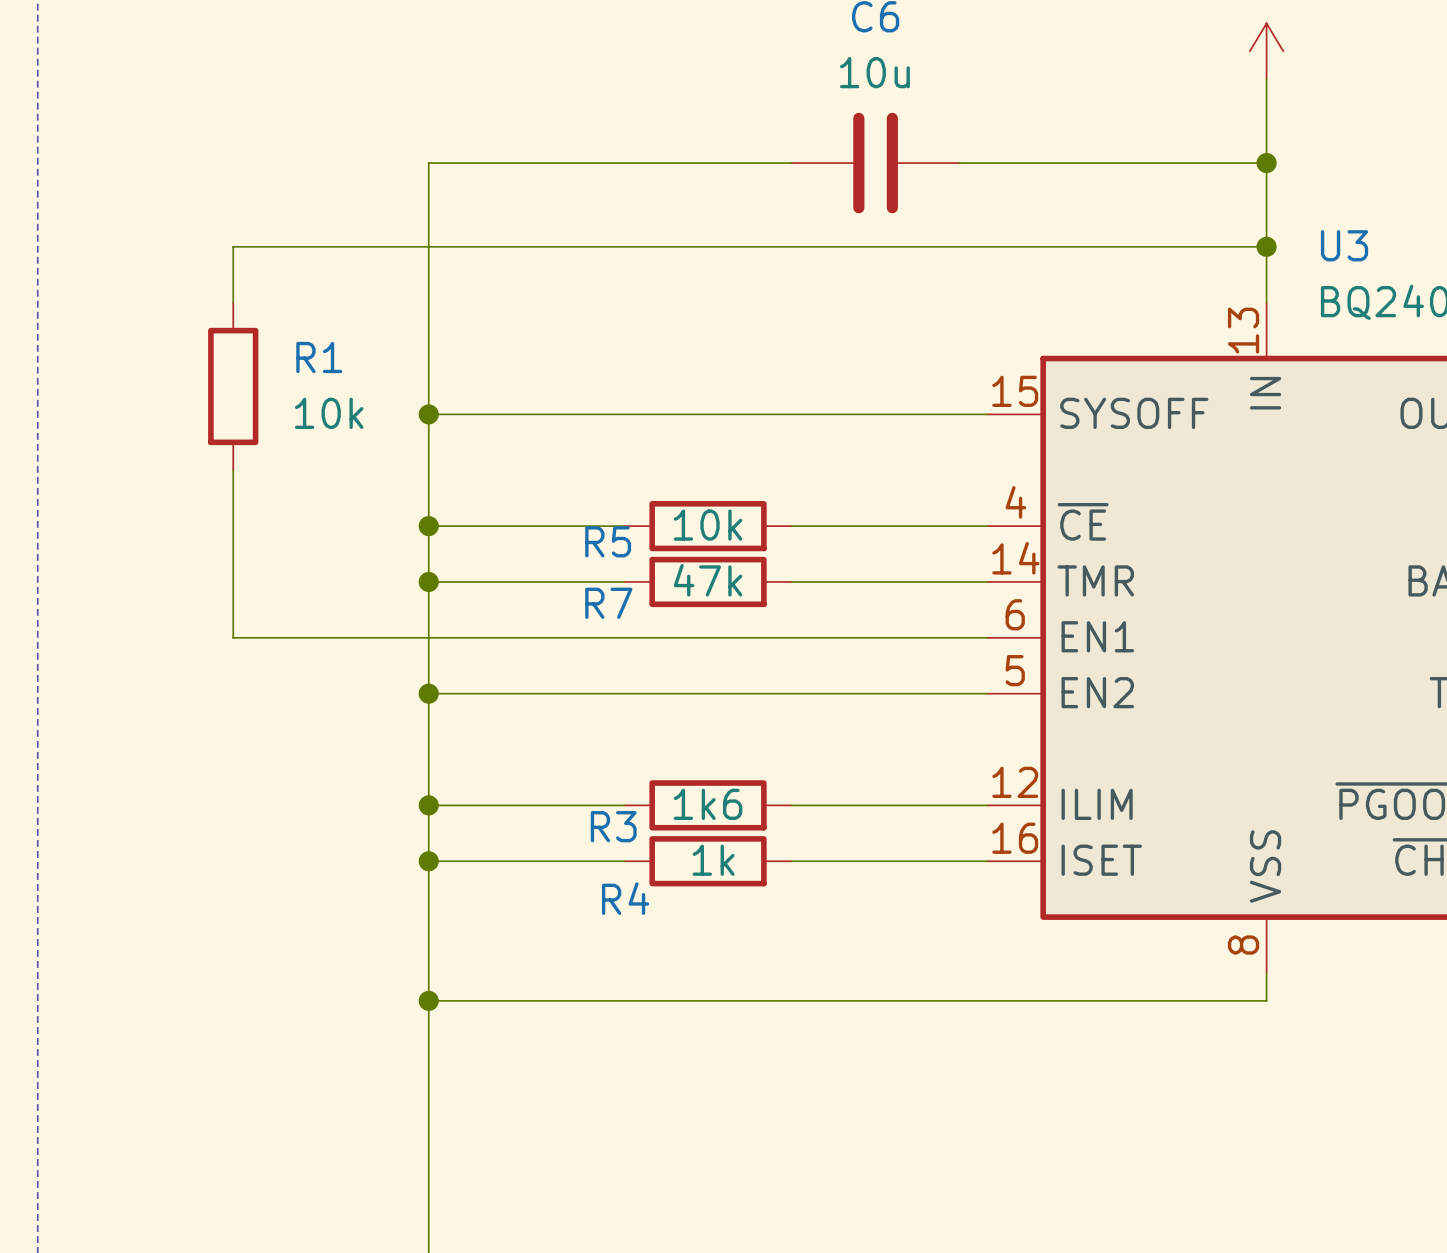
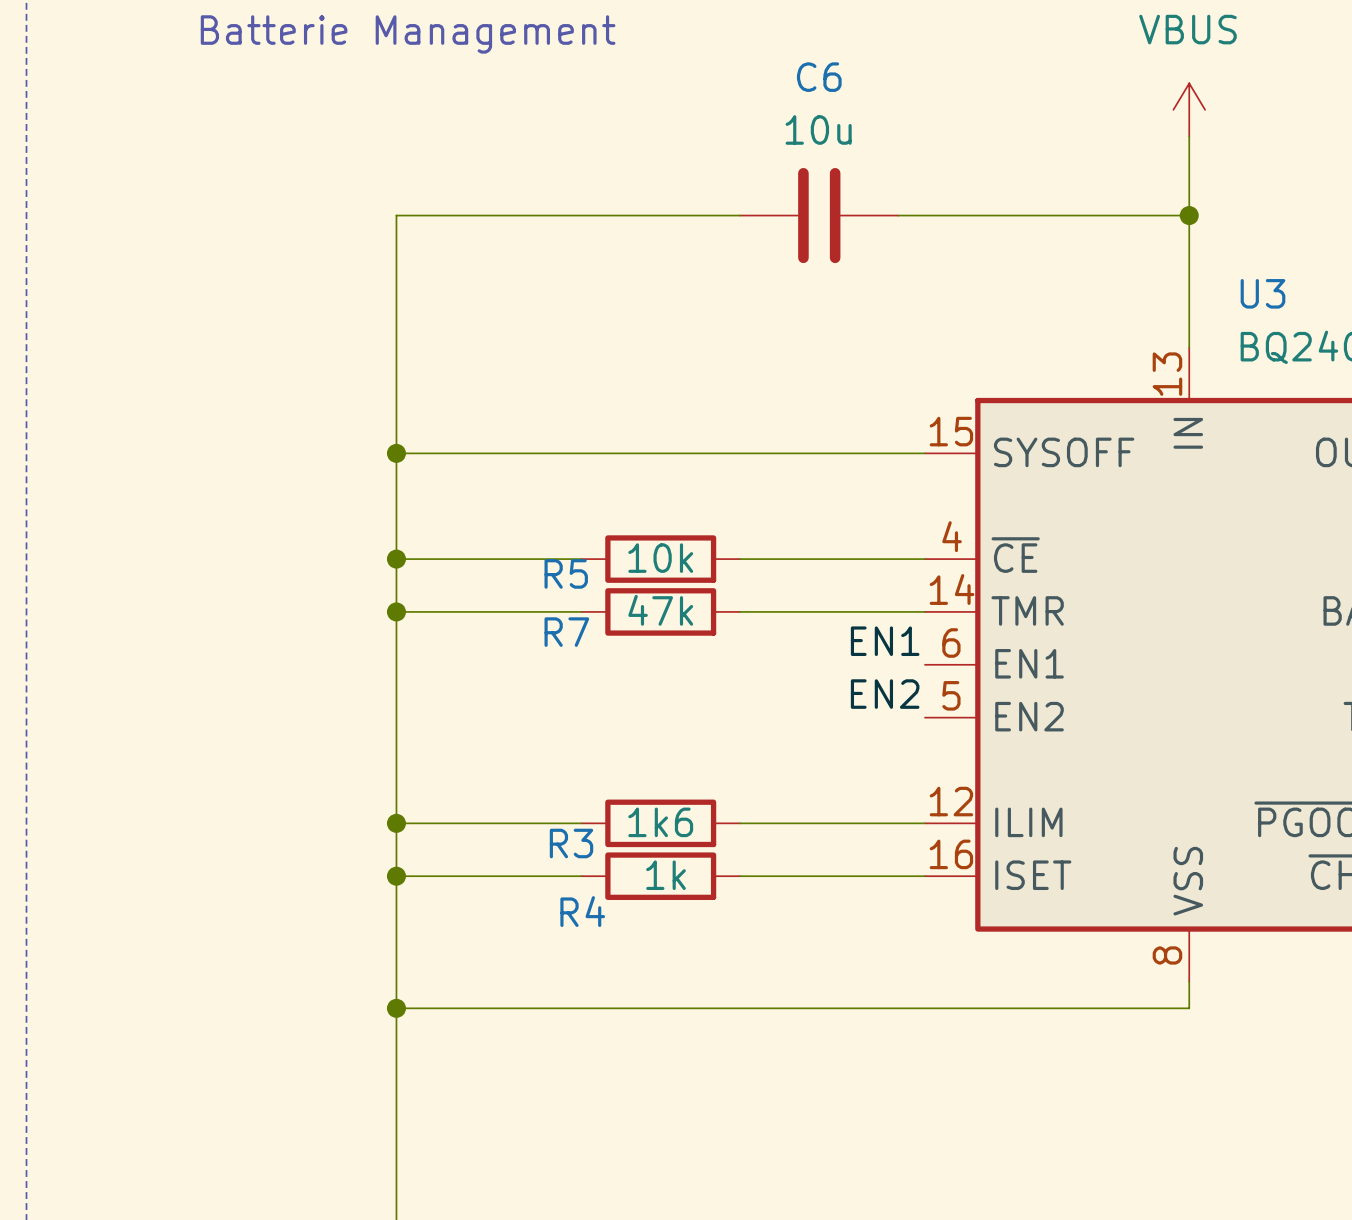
wire: (1266, 246) (233, 246) (233, 302) -> none
junction: (1266, 246) -> none
R1: 10k (233, 386) -> none
wire: (233, 470) (233, 637) (987, 637) -> none
label: none -> EN1 (885, 641)
label: none -> EN2 (885, 694)
wire: (428, 693) (987, 693) -> none
junction: (428, 693) -> none

